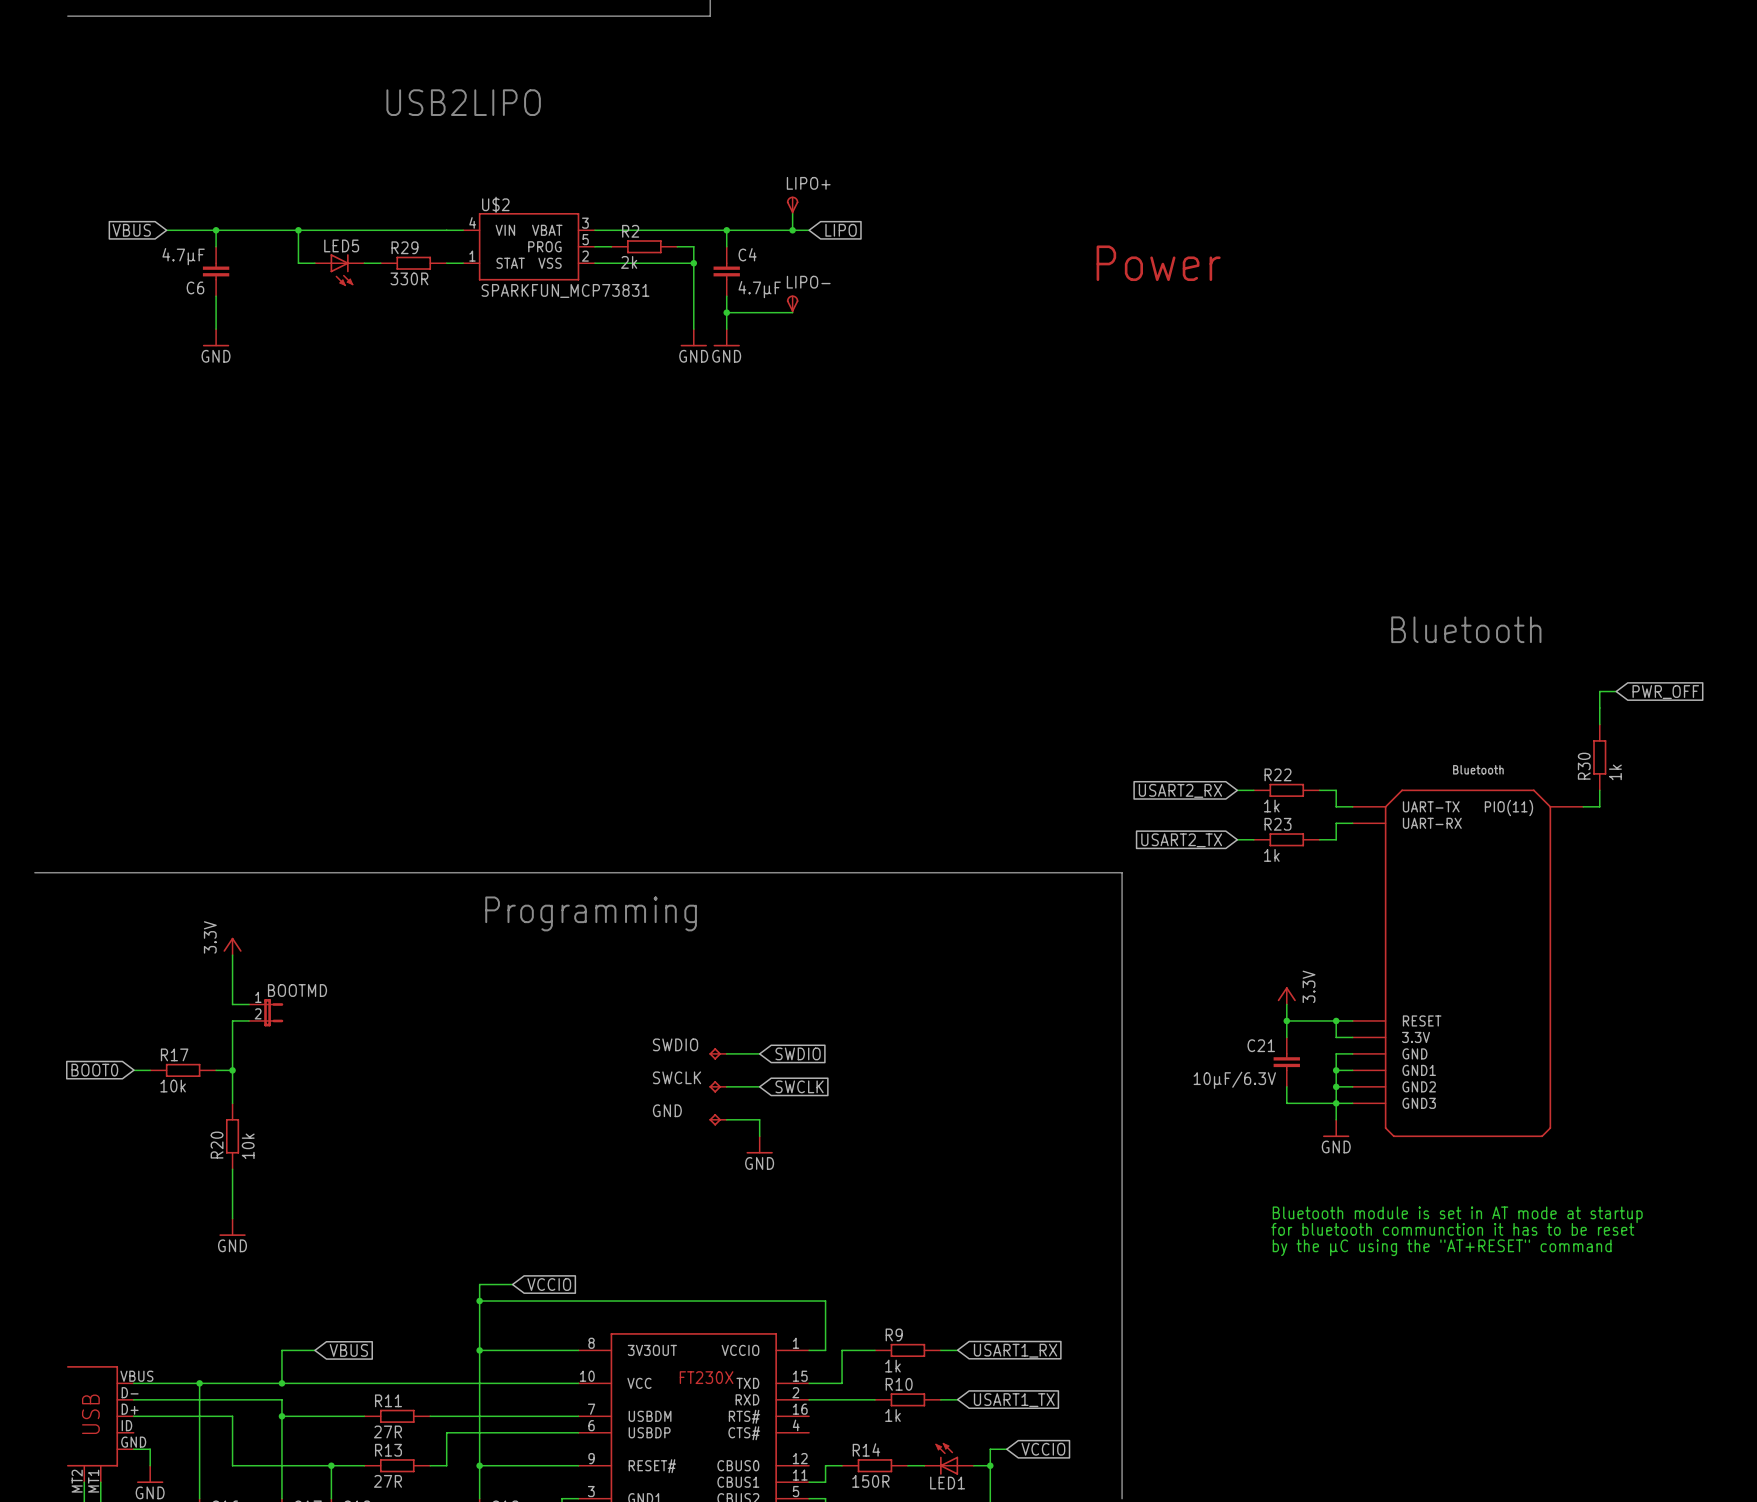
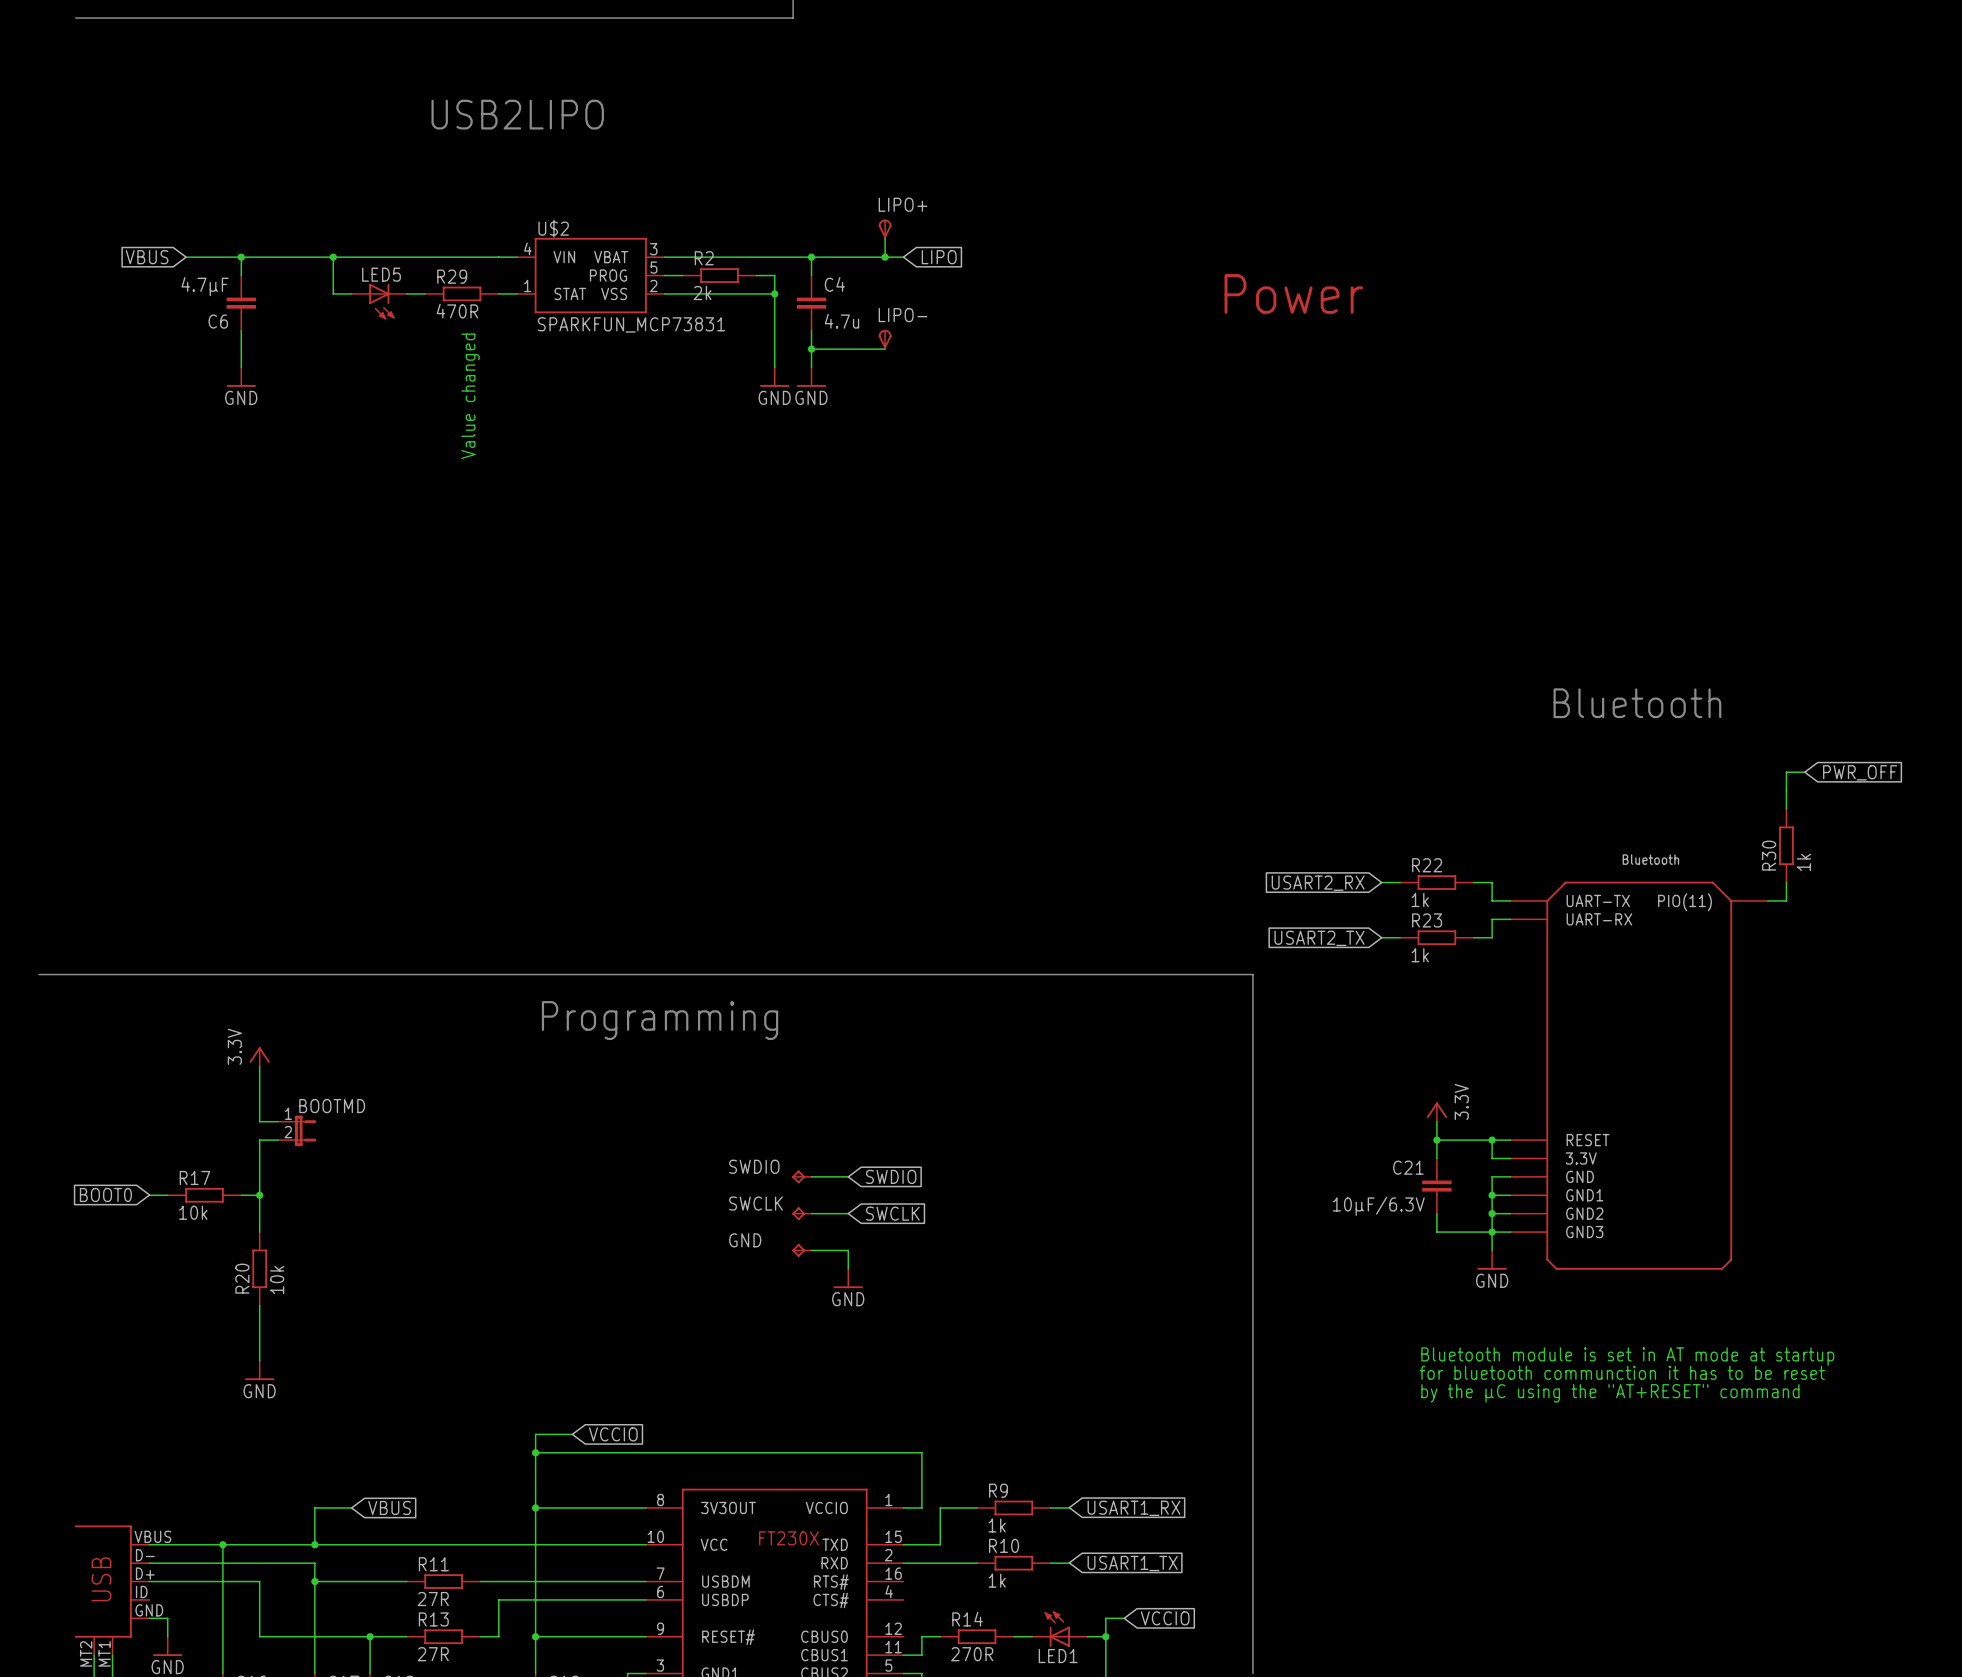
R29 value: 330R (409, 278) -> 470R (457, 311)
C4 value: 4.7µF (759, 289) -> 4.7u (841, 321)
text: none -> Value changed (470, 396)
R14 value: 150R (870, 1481) -> 270R (972, 1654)

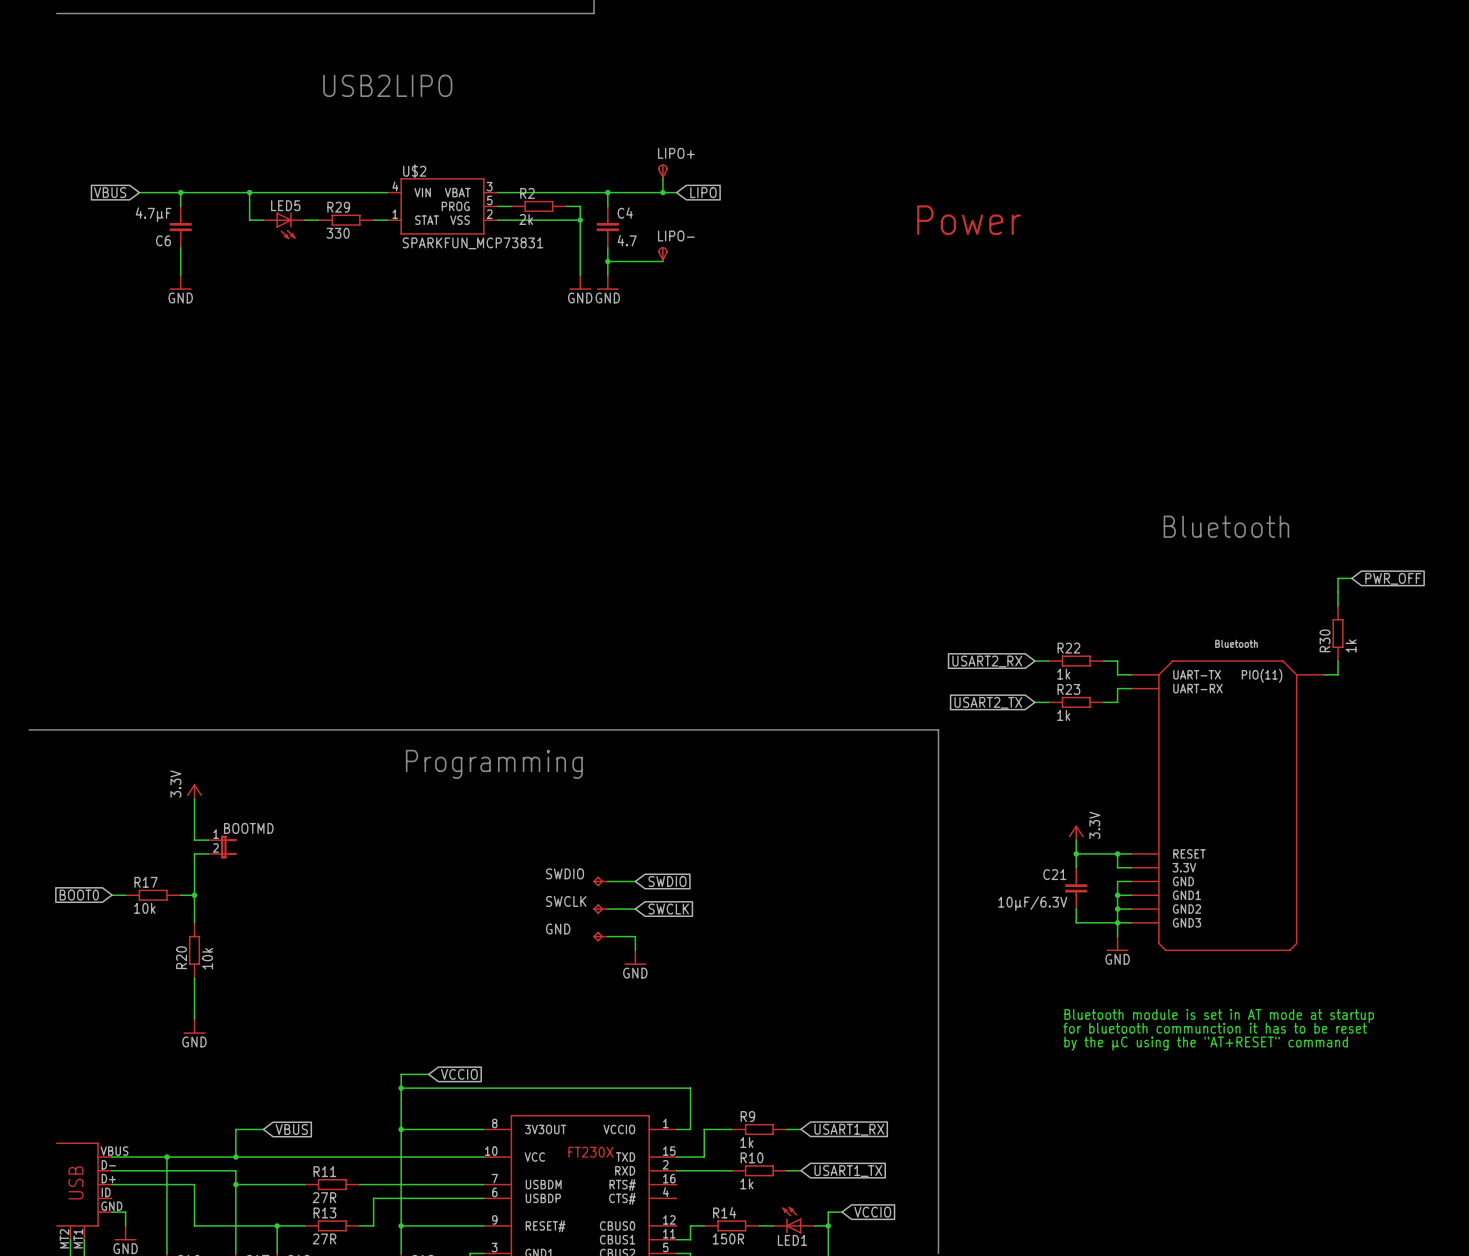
R29 value: 470R (457, 311) -> 330 (338, 233)
C4 value: 4.7u (841, 321) -> 4.7 (627, 240)
text: Value changed (470, 396) -> none
R14 value: 270R (972, 1654) -> 150R (728, 1239)

